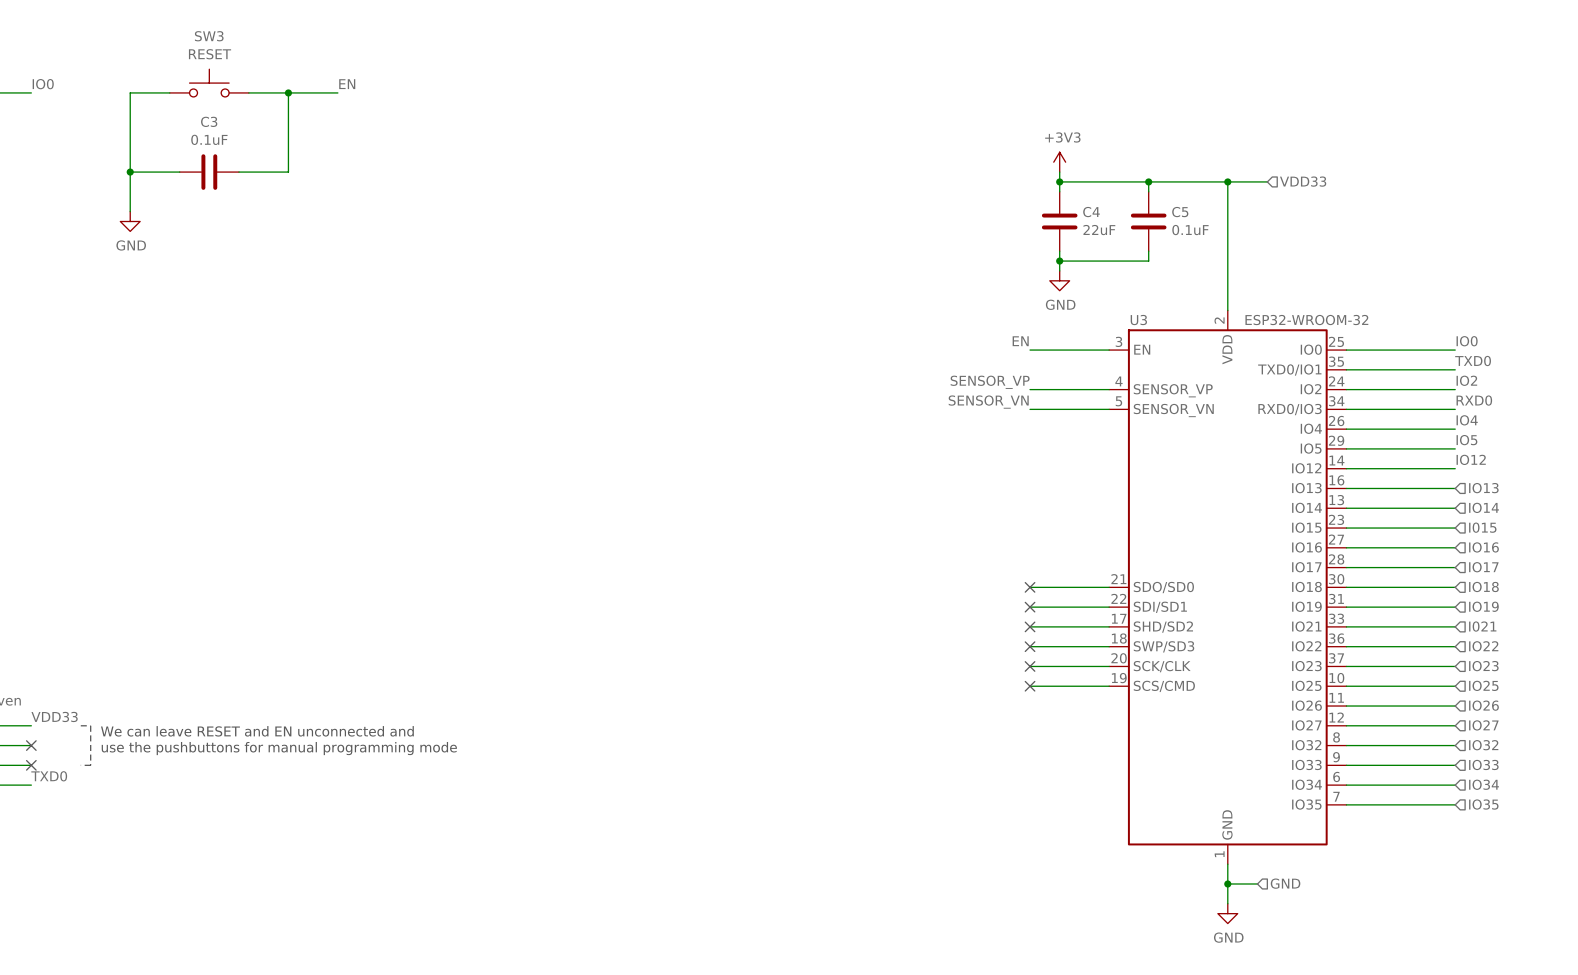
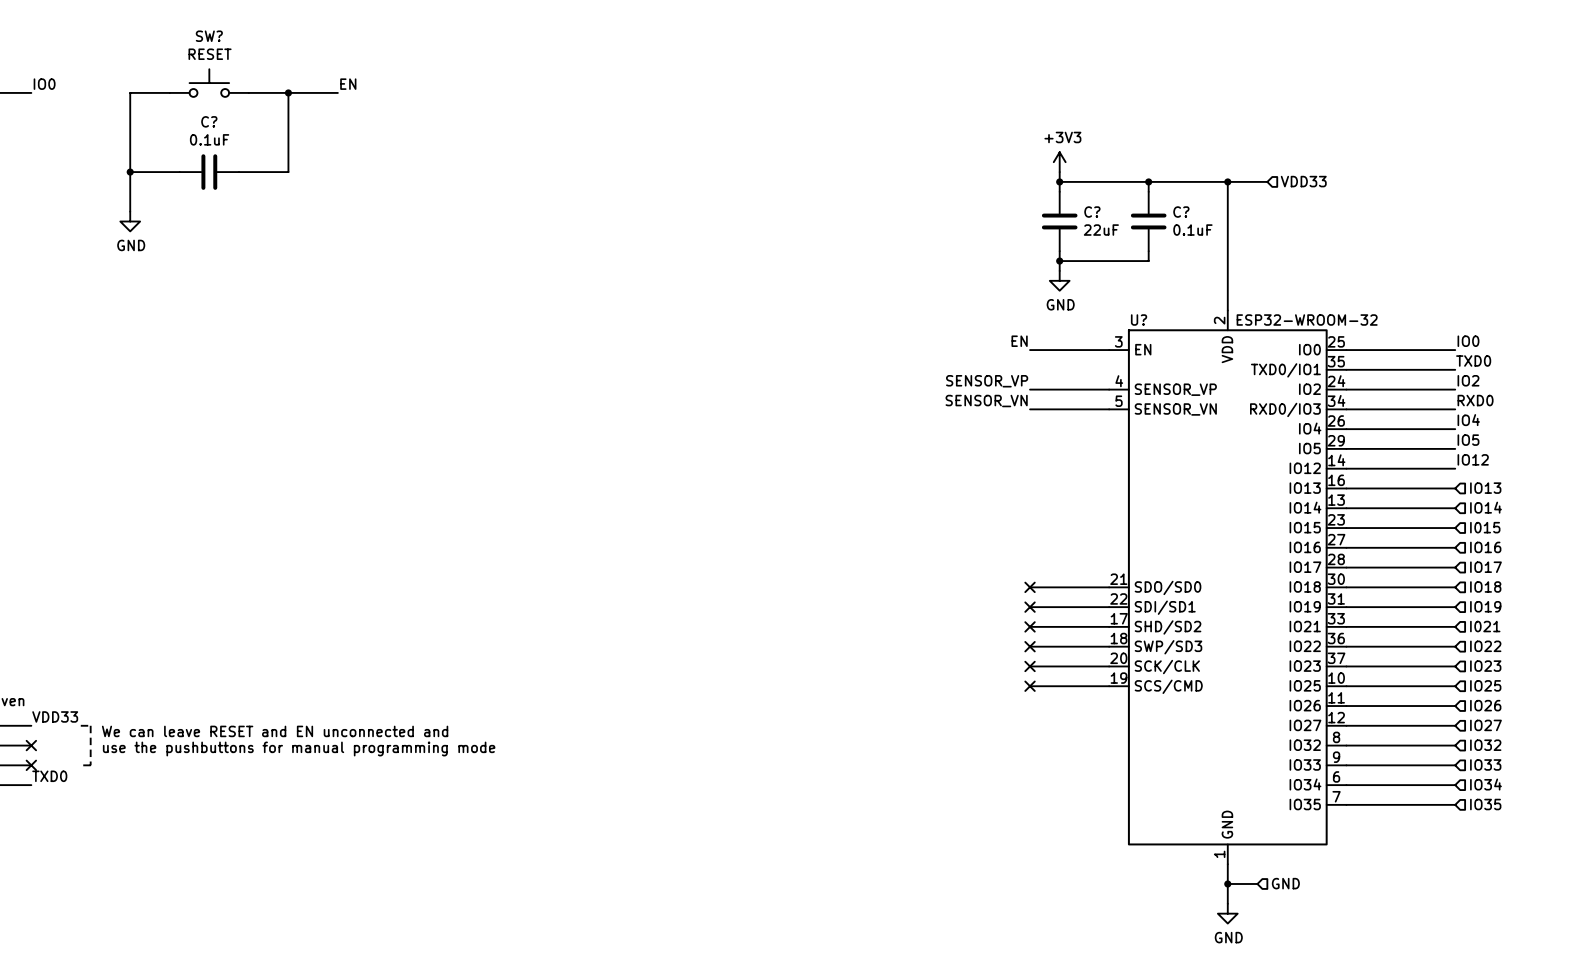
SW3 name: SW3 (209, 36) -> SW? (209, 36)
C3 name: C3 (209, 121) -> C? (209, 121)
C4 name: C4 (1091, 212) -> C? (1092, 212)
C5 name: C5 (1180, 212) -> C? (1181, 212)
U3 name: U3 (1138, 320) -> U? (1139, 320)

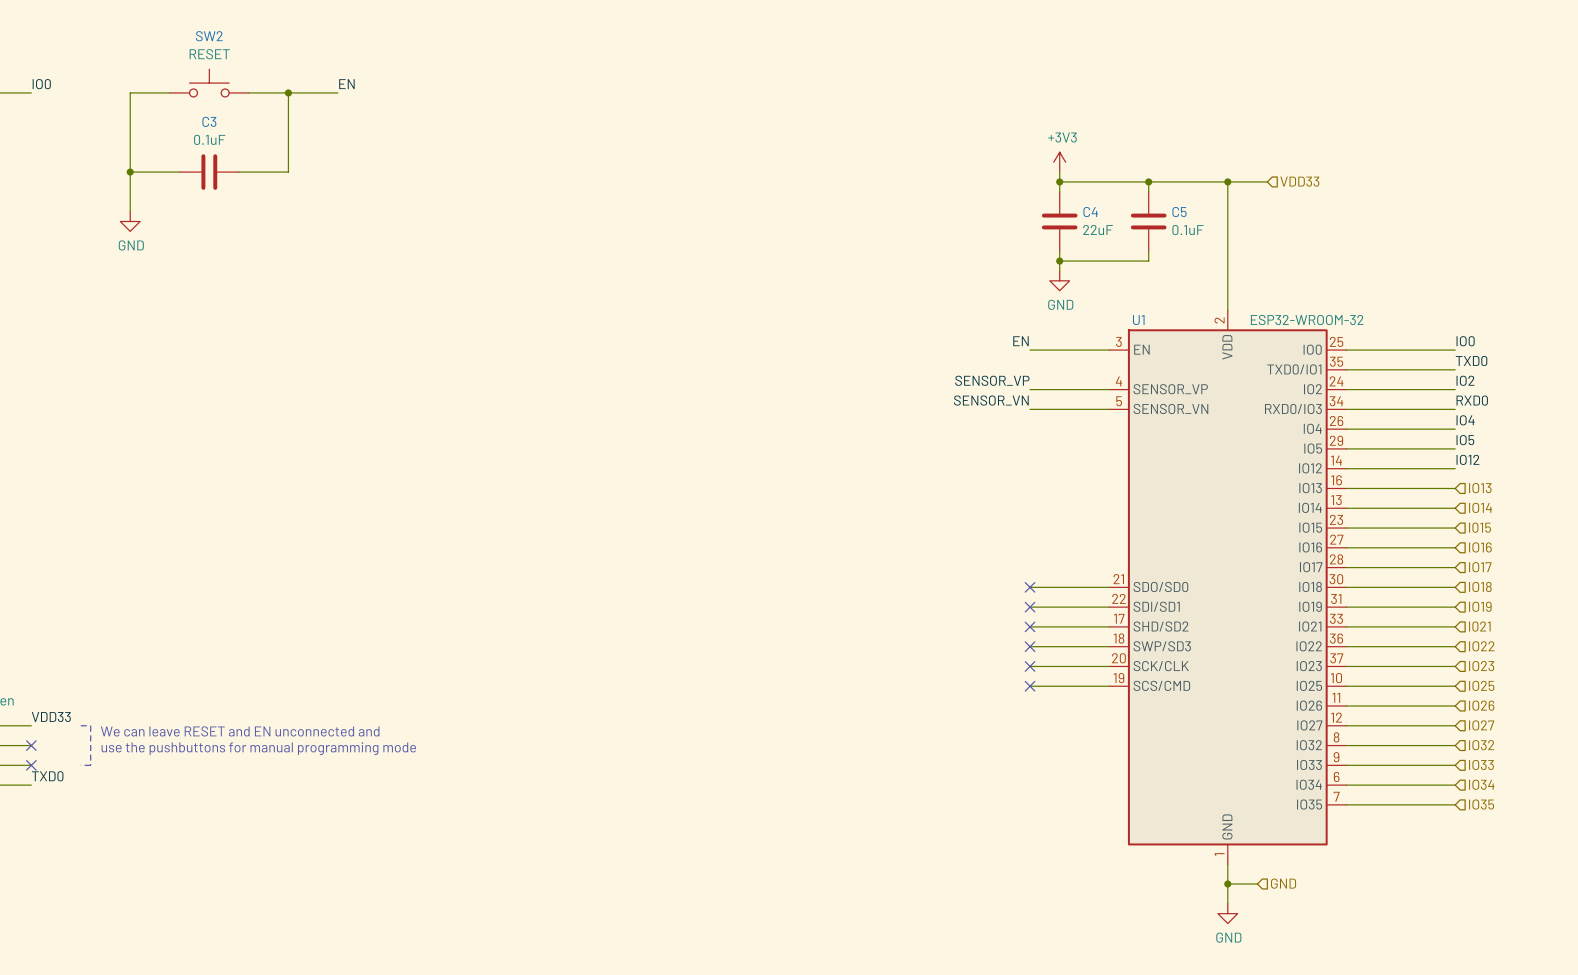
SW? name: SW? (209, 36) -> SW2 (209, 36)
C? name: C? (209, 121) -> C3 (209, 121)
C? name: C? (1092, 212) -> C4 (1090, 212)
C? name: C? (1181, 212) -> C5 (1179, 212)
U? name: U? (1139, 320) -> U1 (1138, 320)

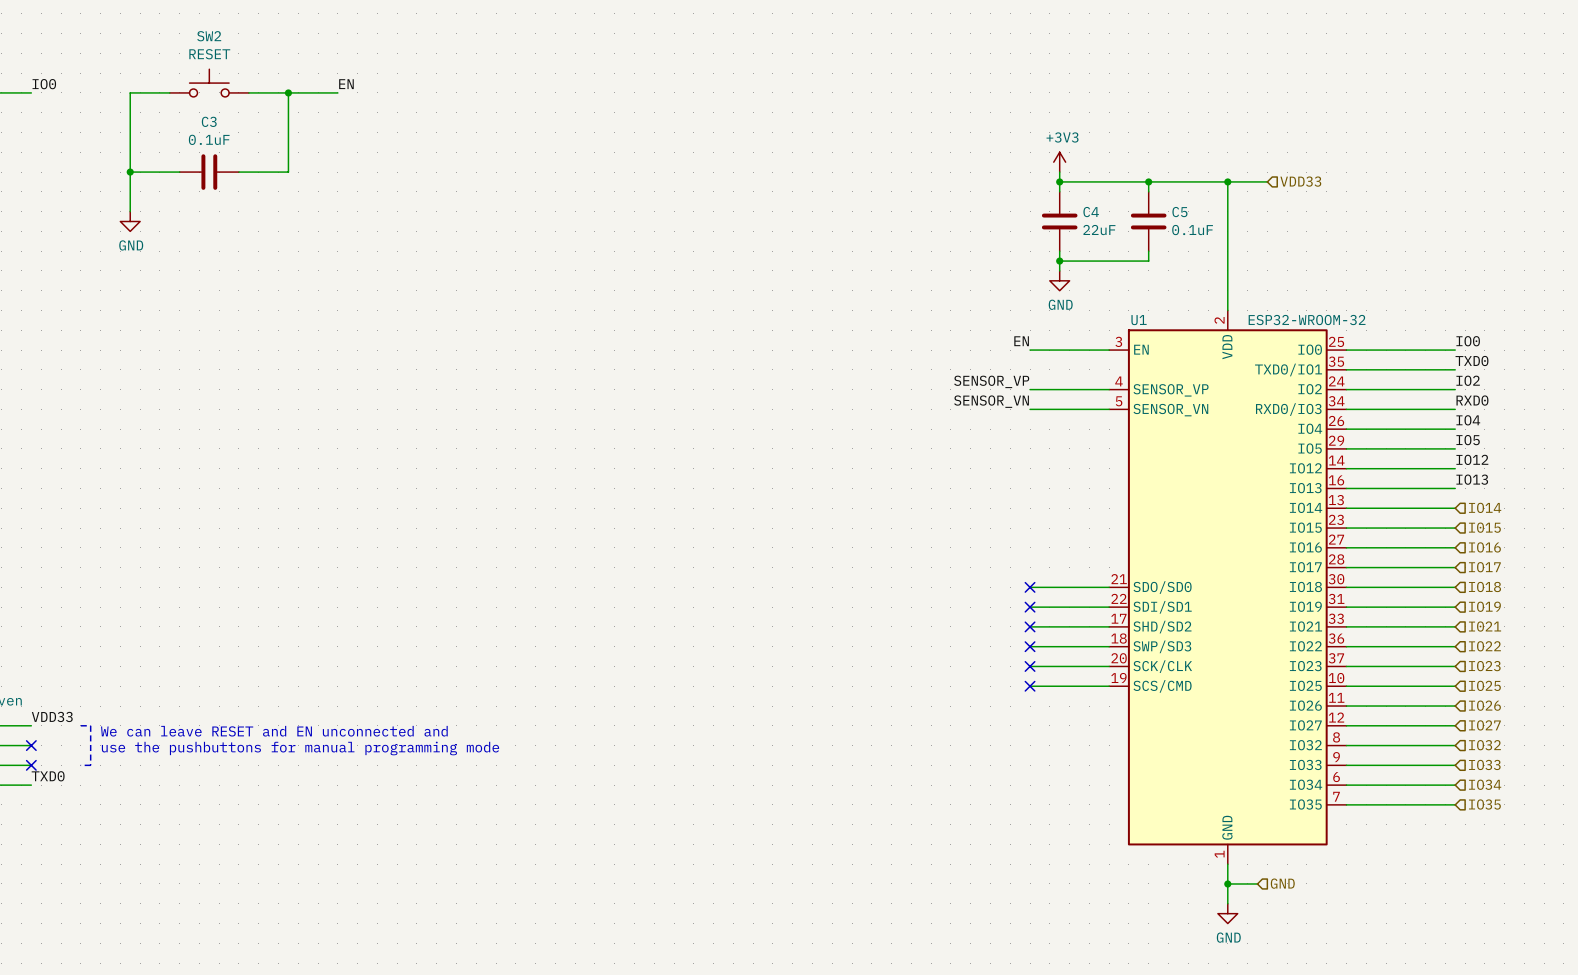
label: none -> IO13 (1472, 479)
hierarchical label: IO13 (1480, 488) -> none

